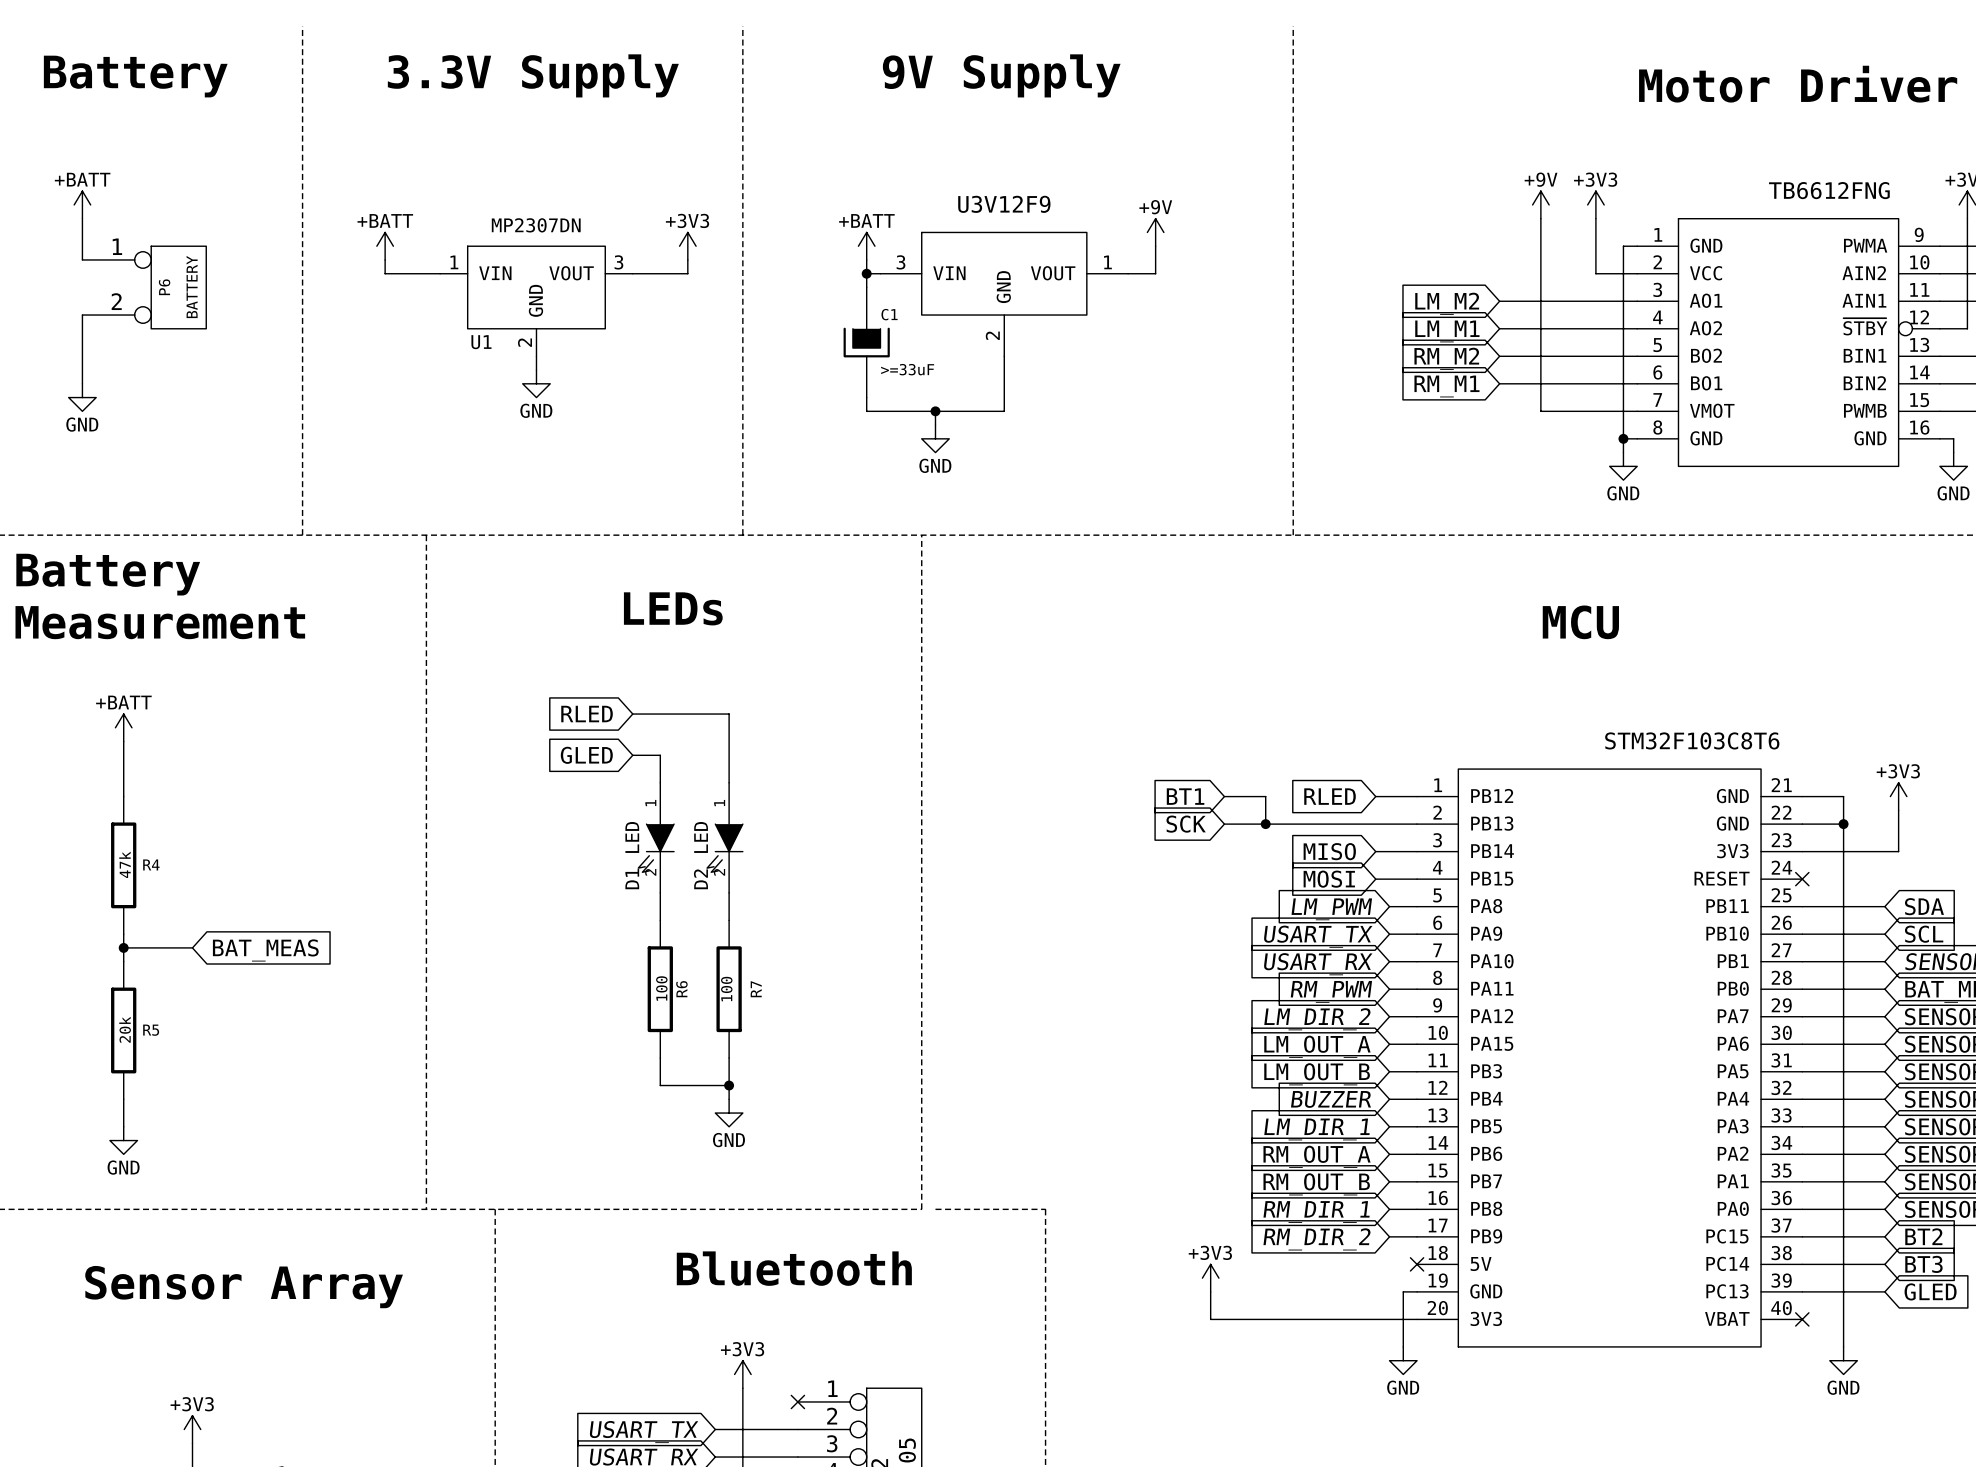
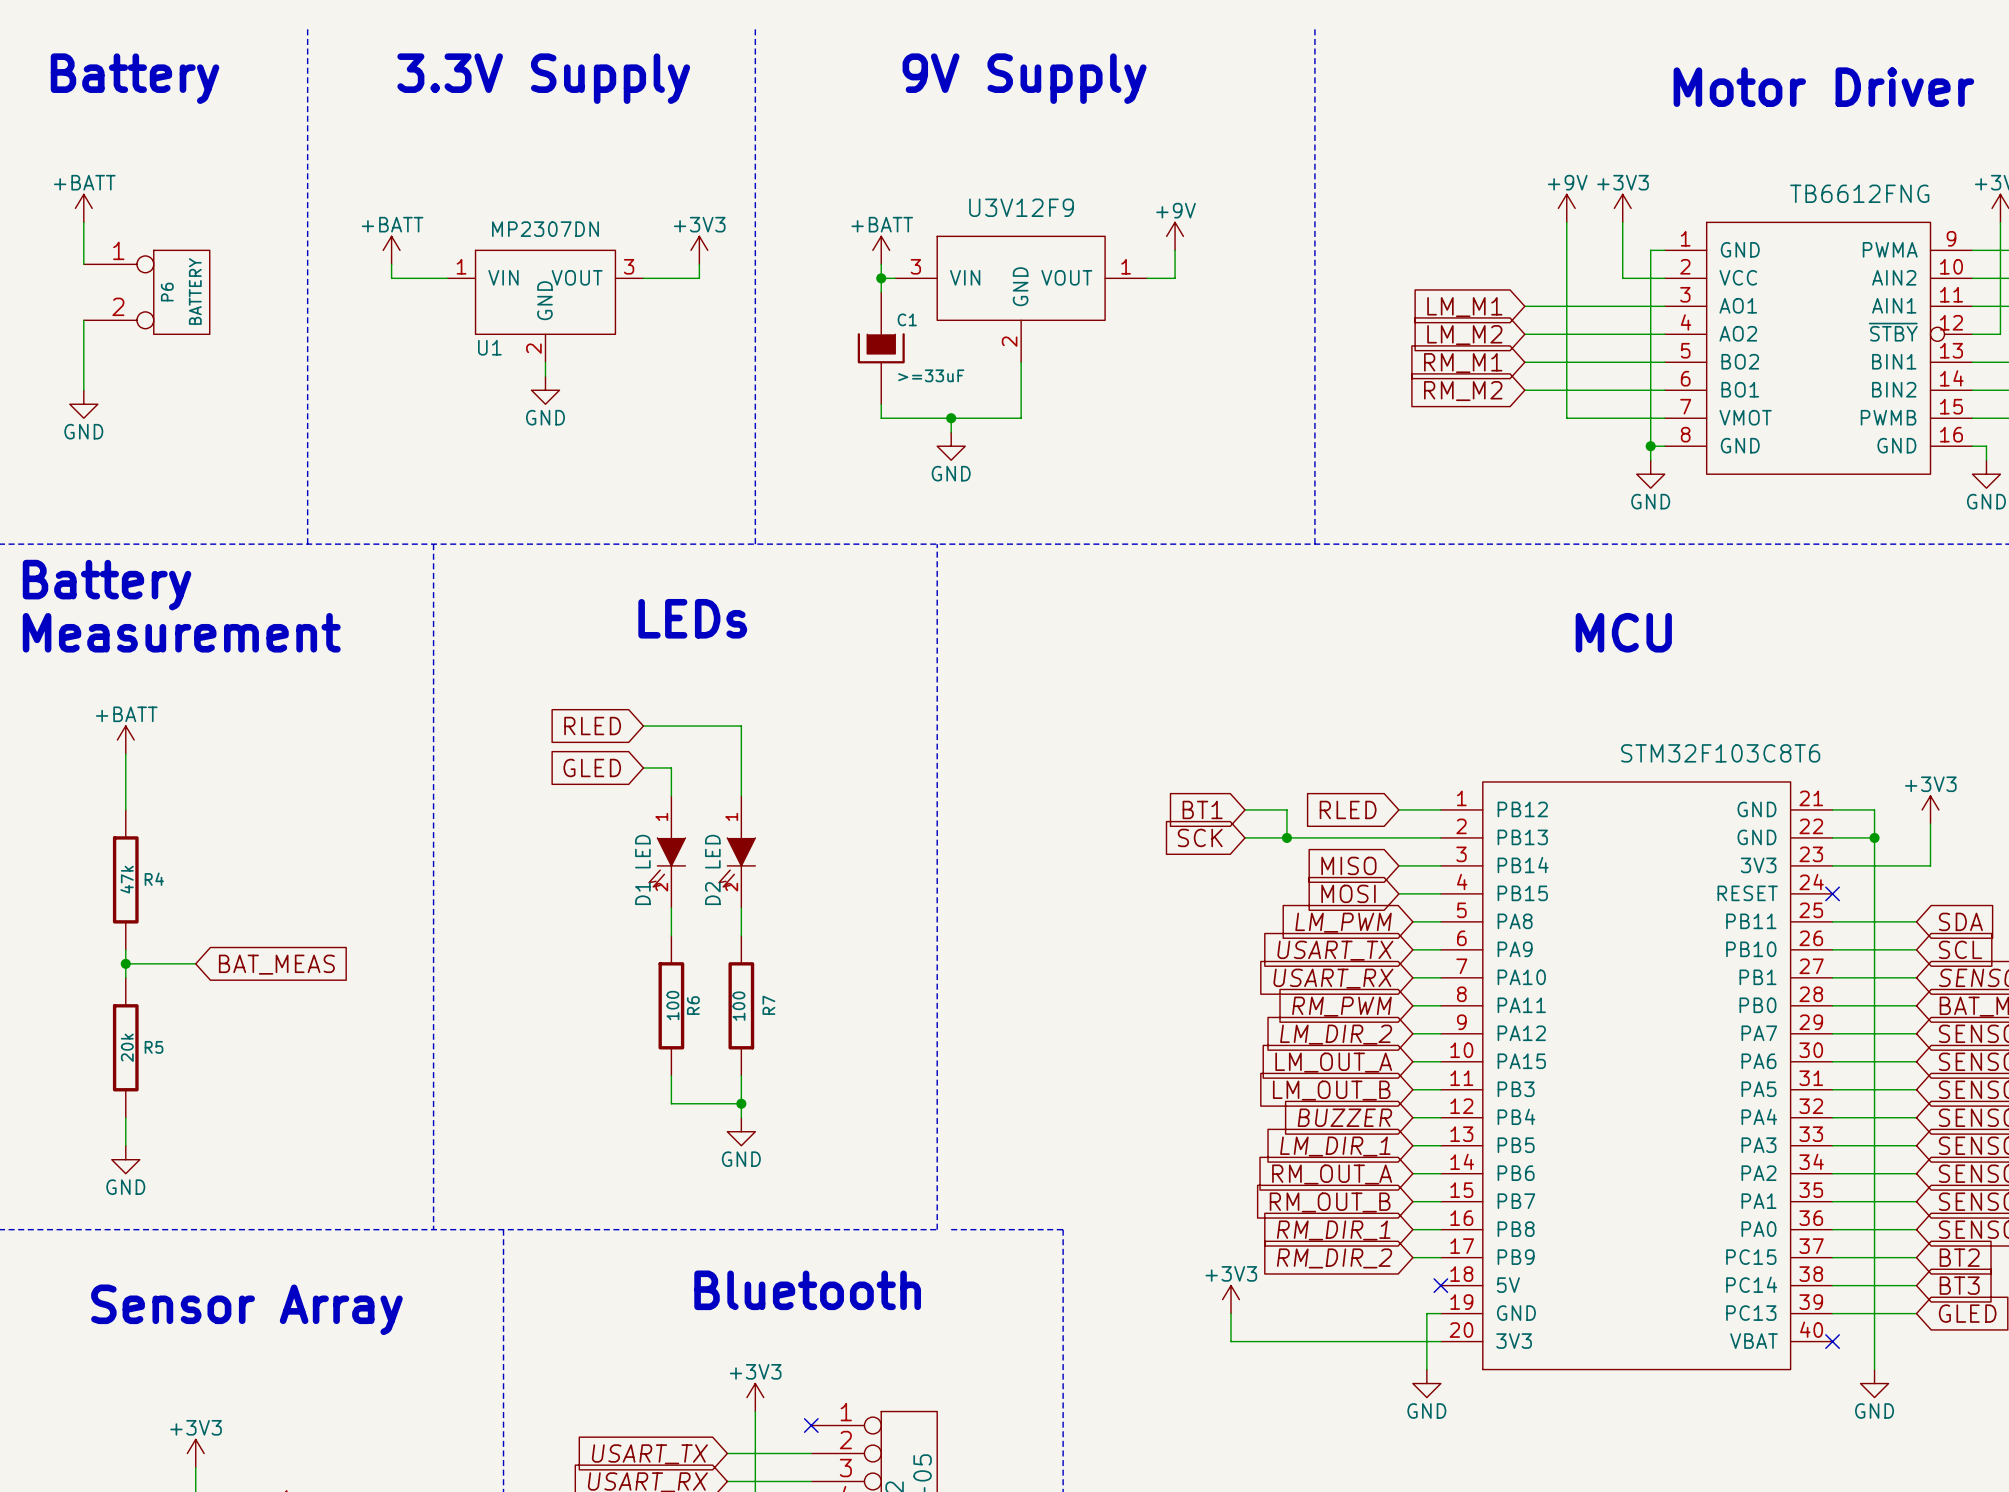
global label: LM_M2 (1447, 303) -> LM_M1 (1464, 307)
global label: LM_M1 (1447, 331) -> LM_M2 (1464, 335)
global label: RM_M2 (1446, 358) -> RM_M1 (1463, 363)
global label: RM_M1 (1446, 386) -> RM_M2 (1463, 391)

